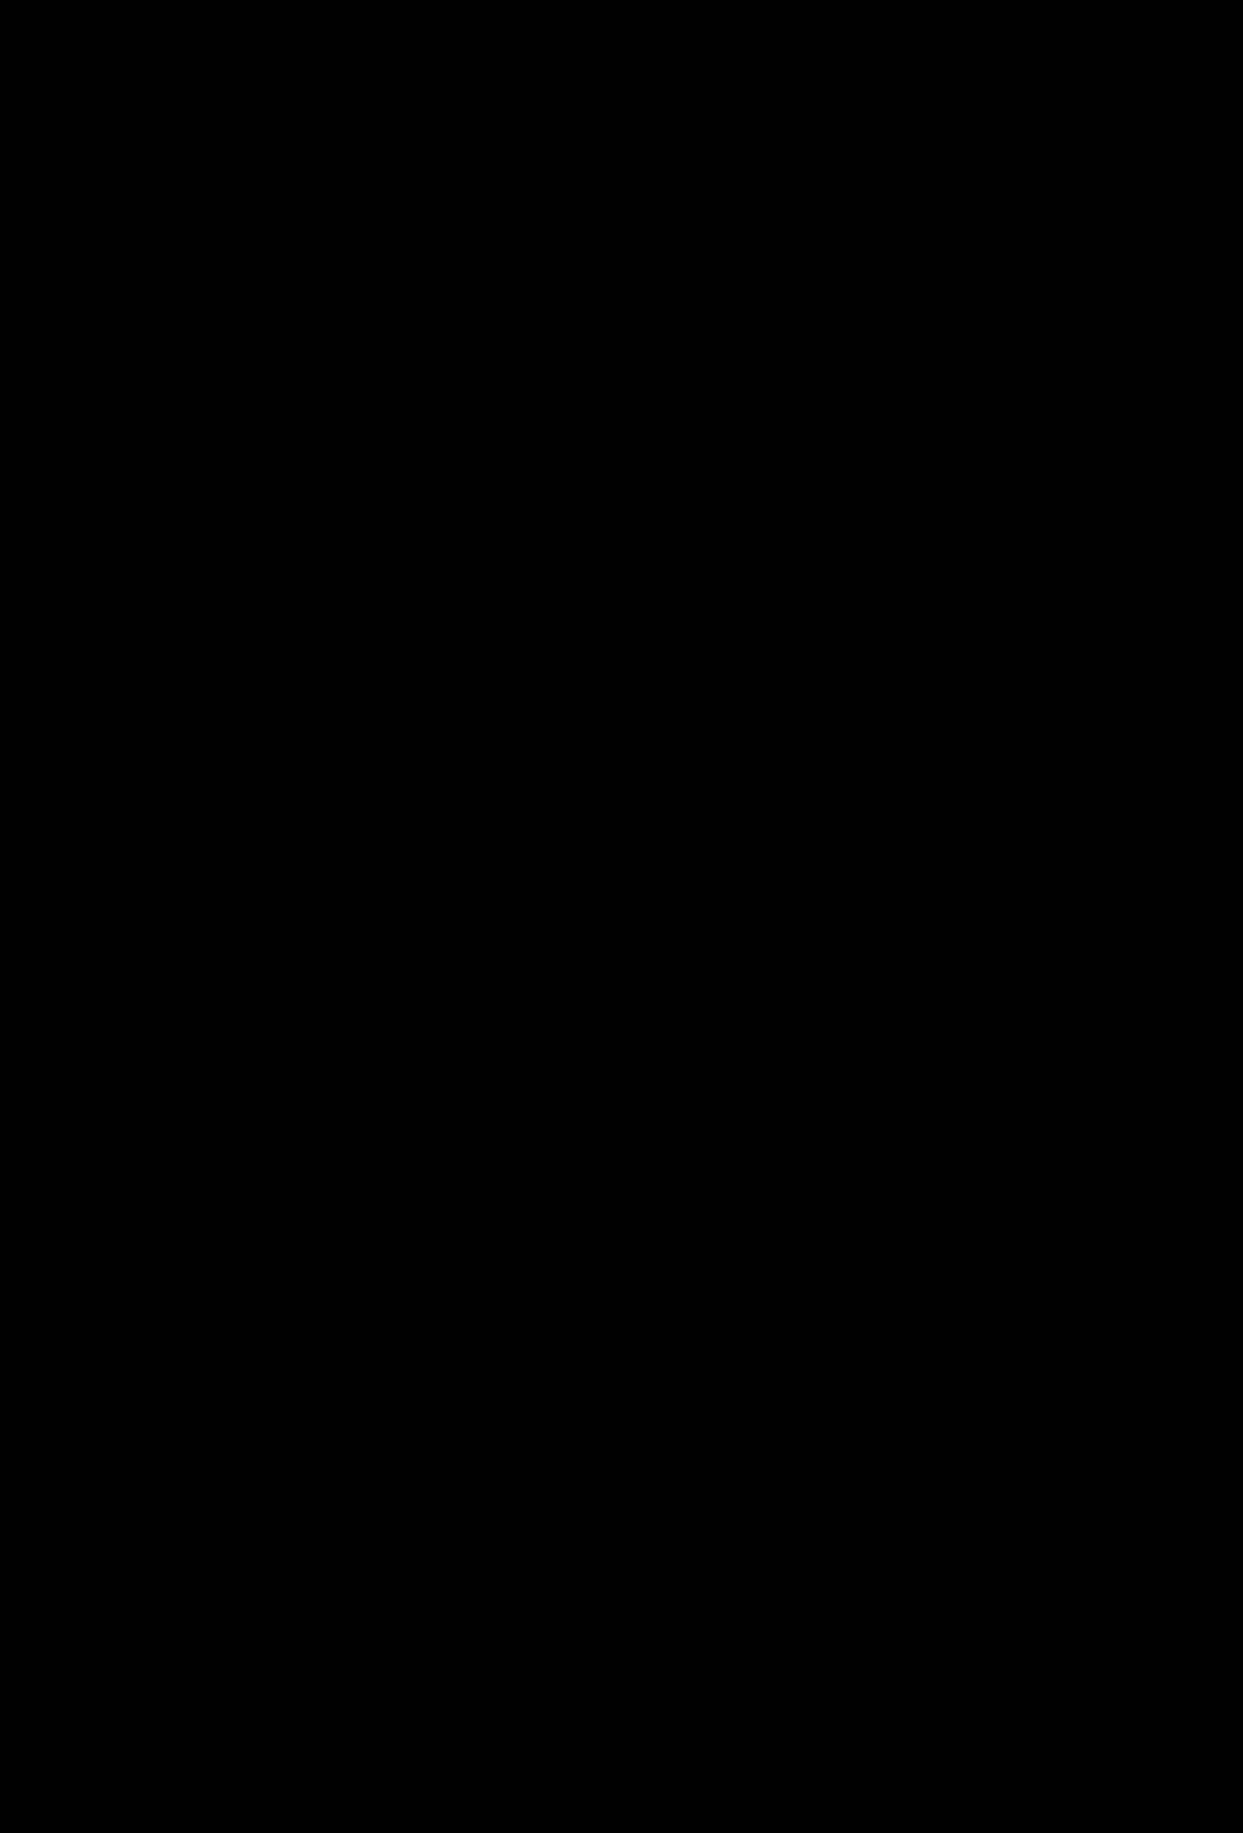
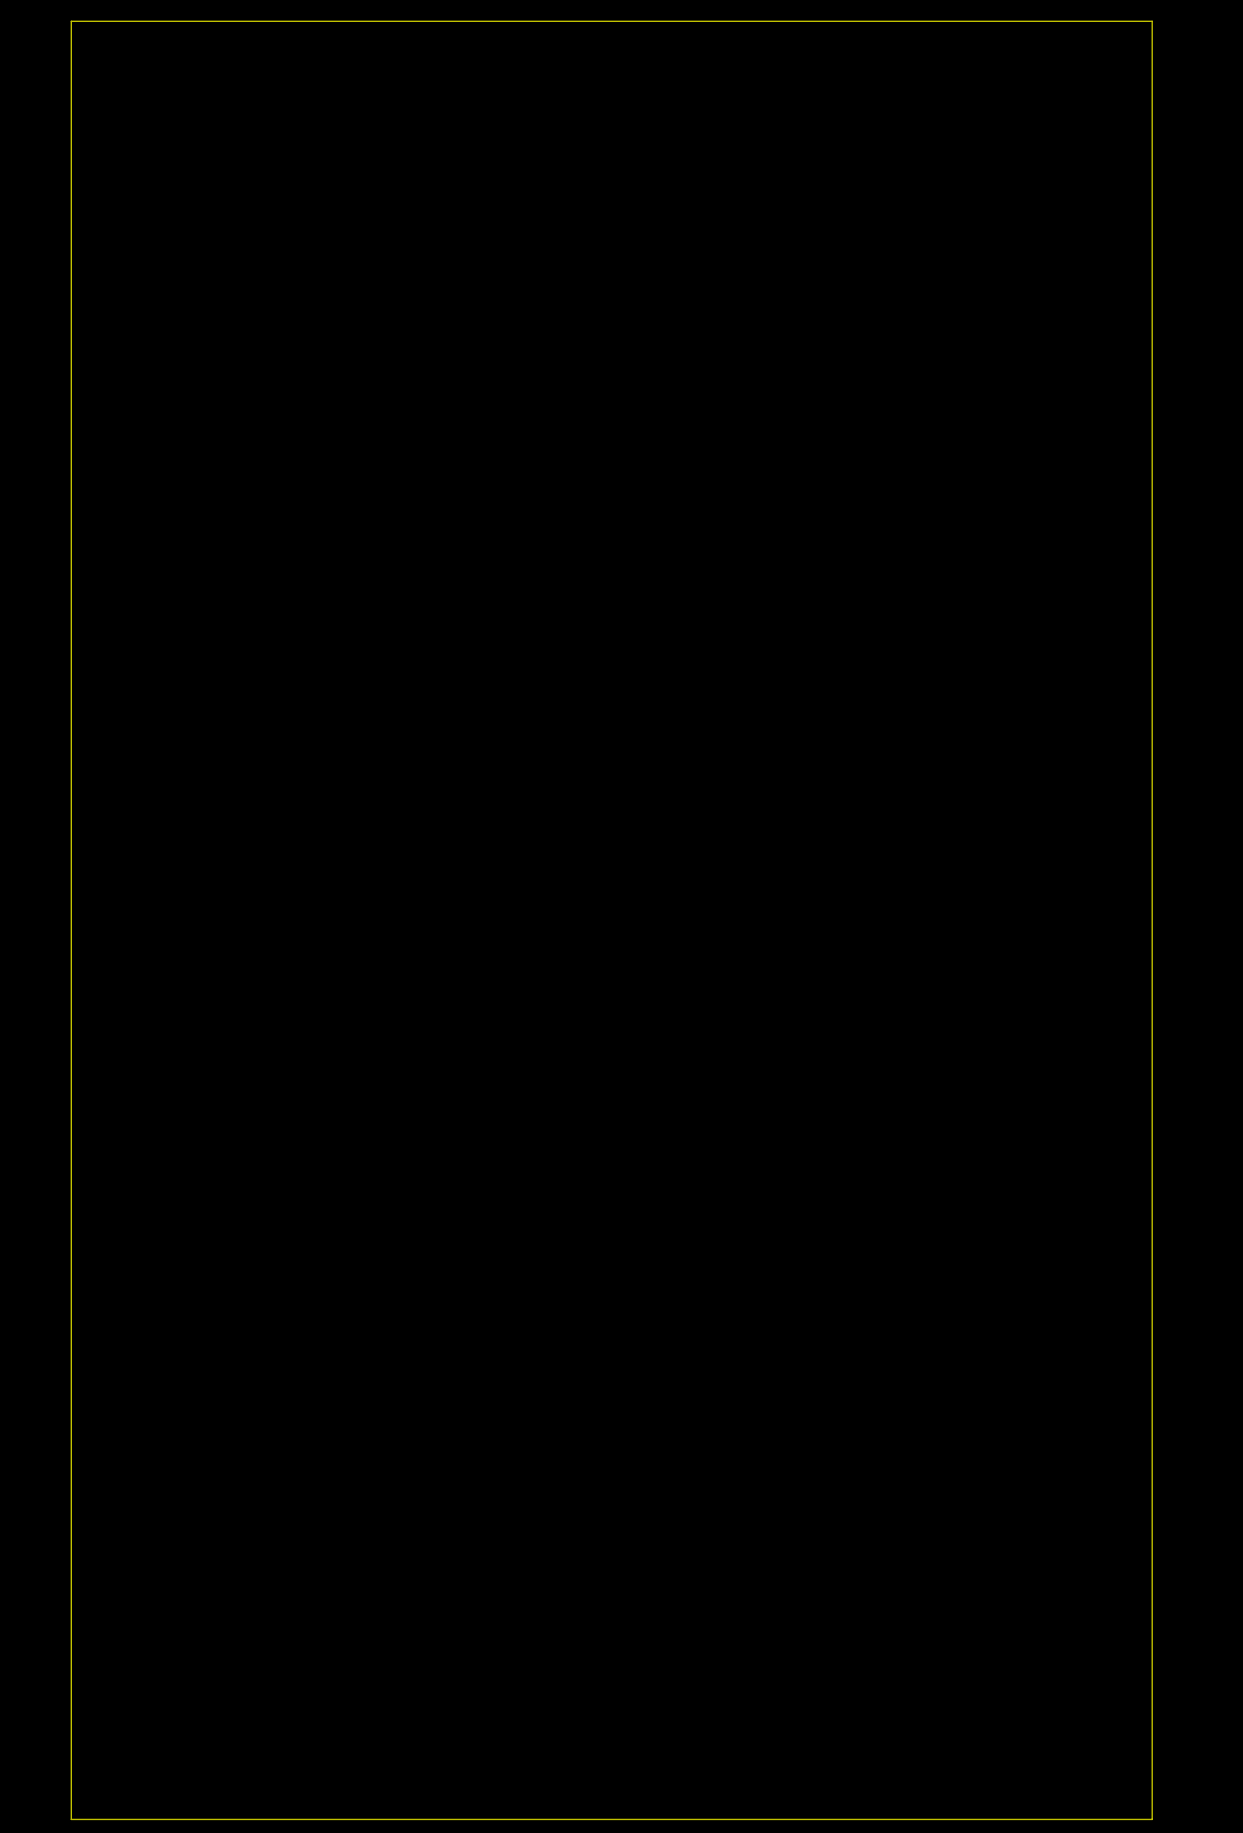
board edge: none -> (1152, 21) (71, 21) (71, 1819) (1152, 1819) (1152, 21)

